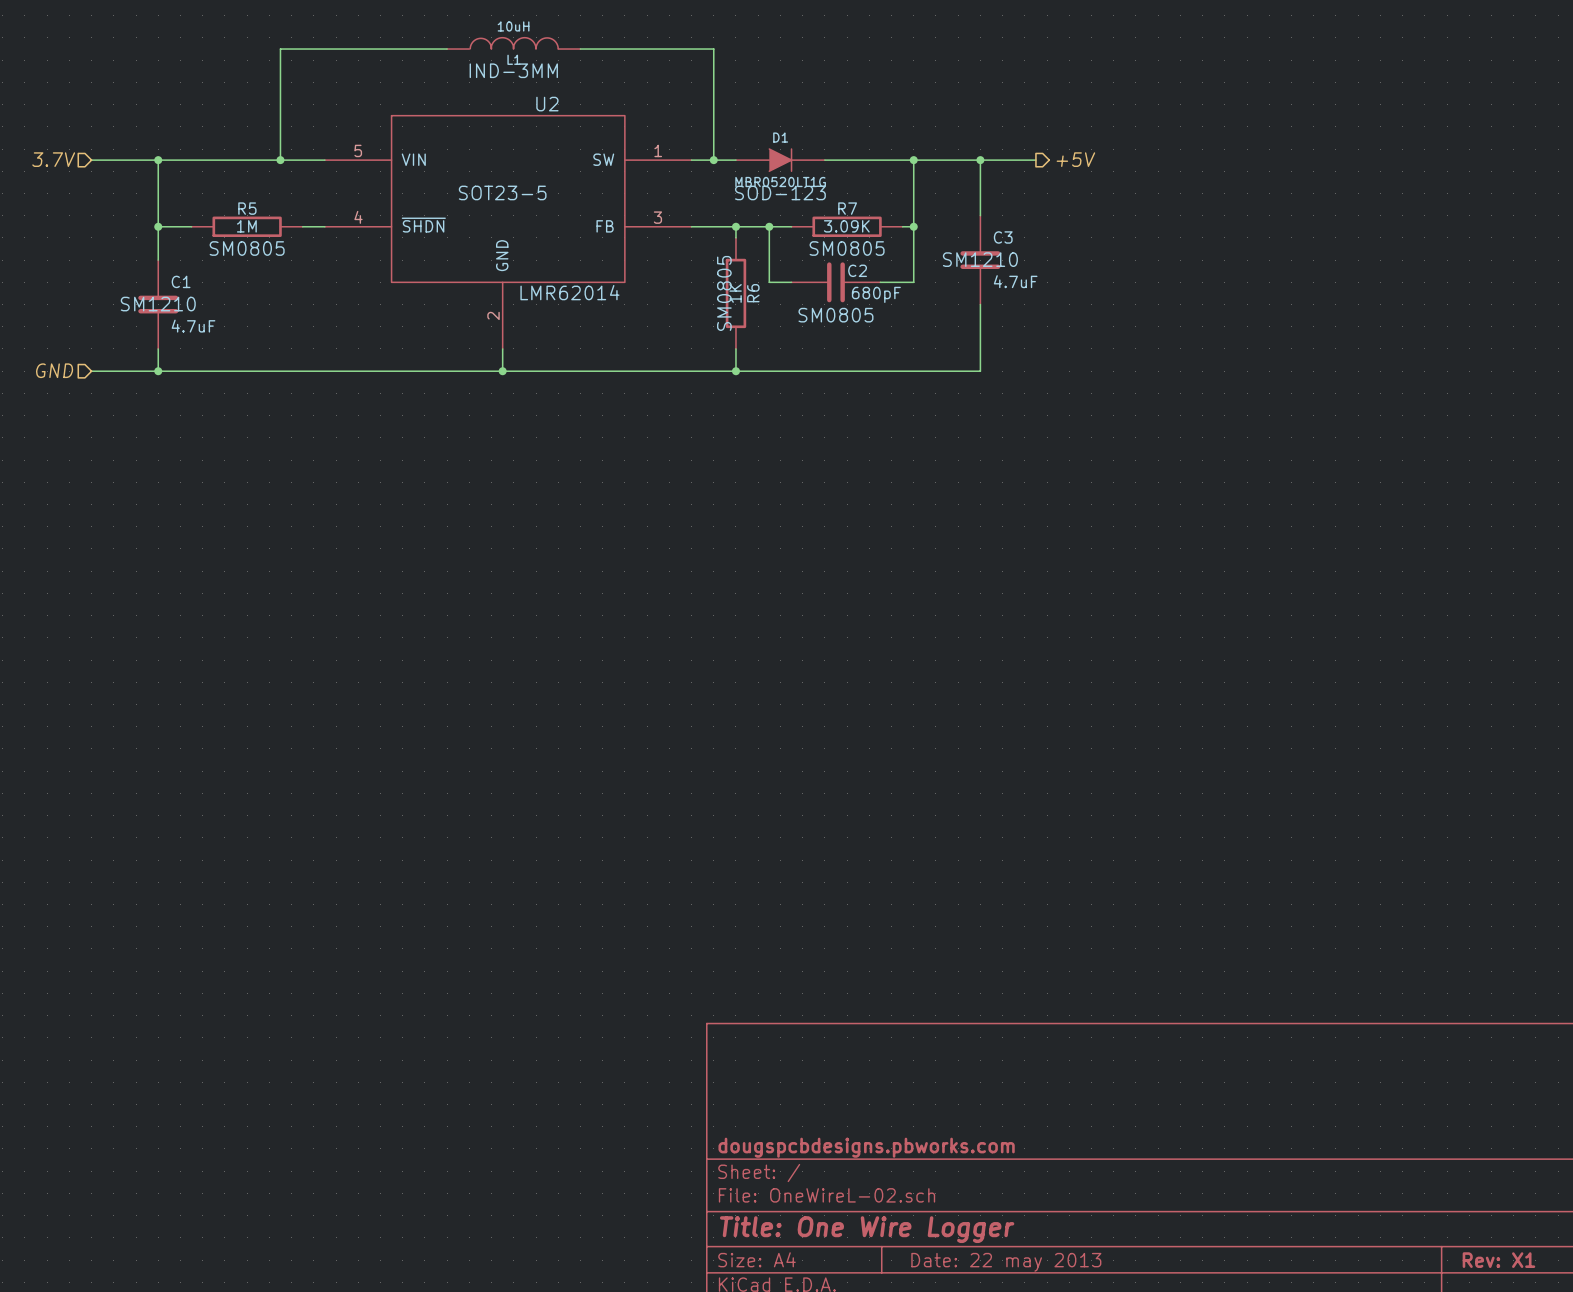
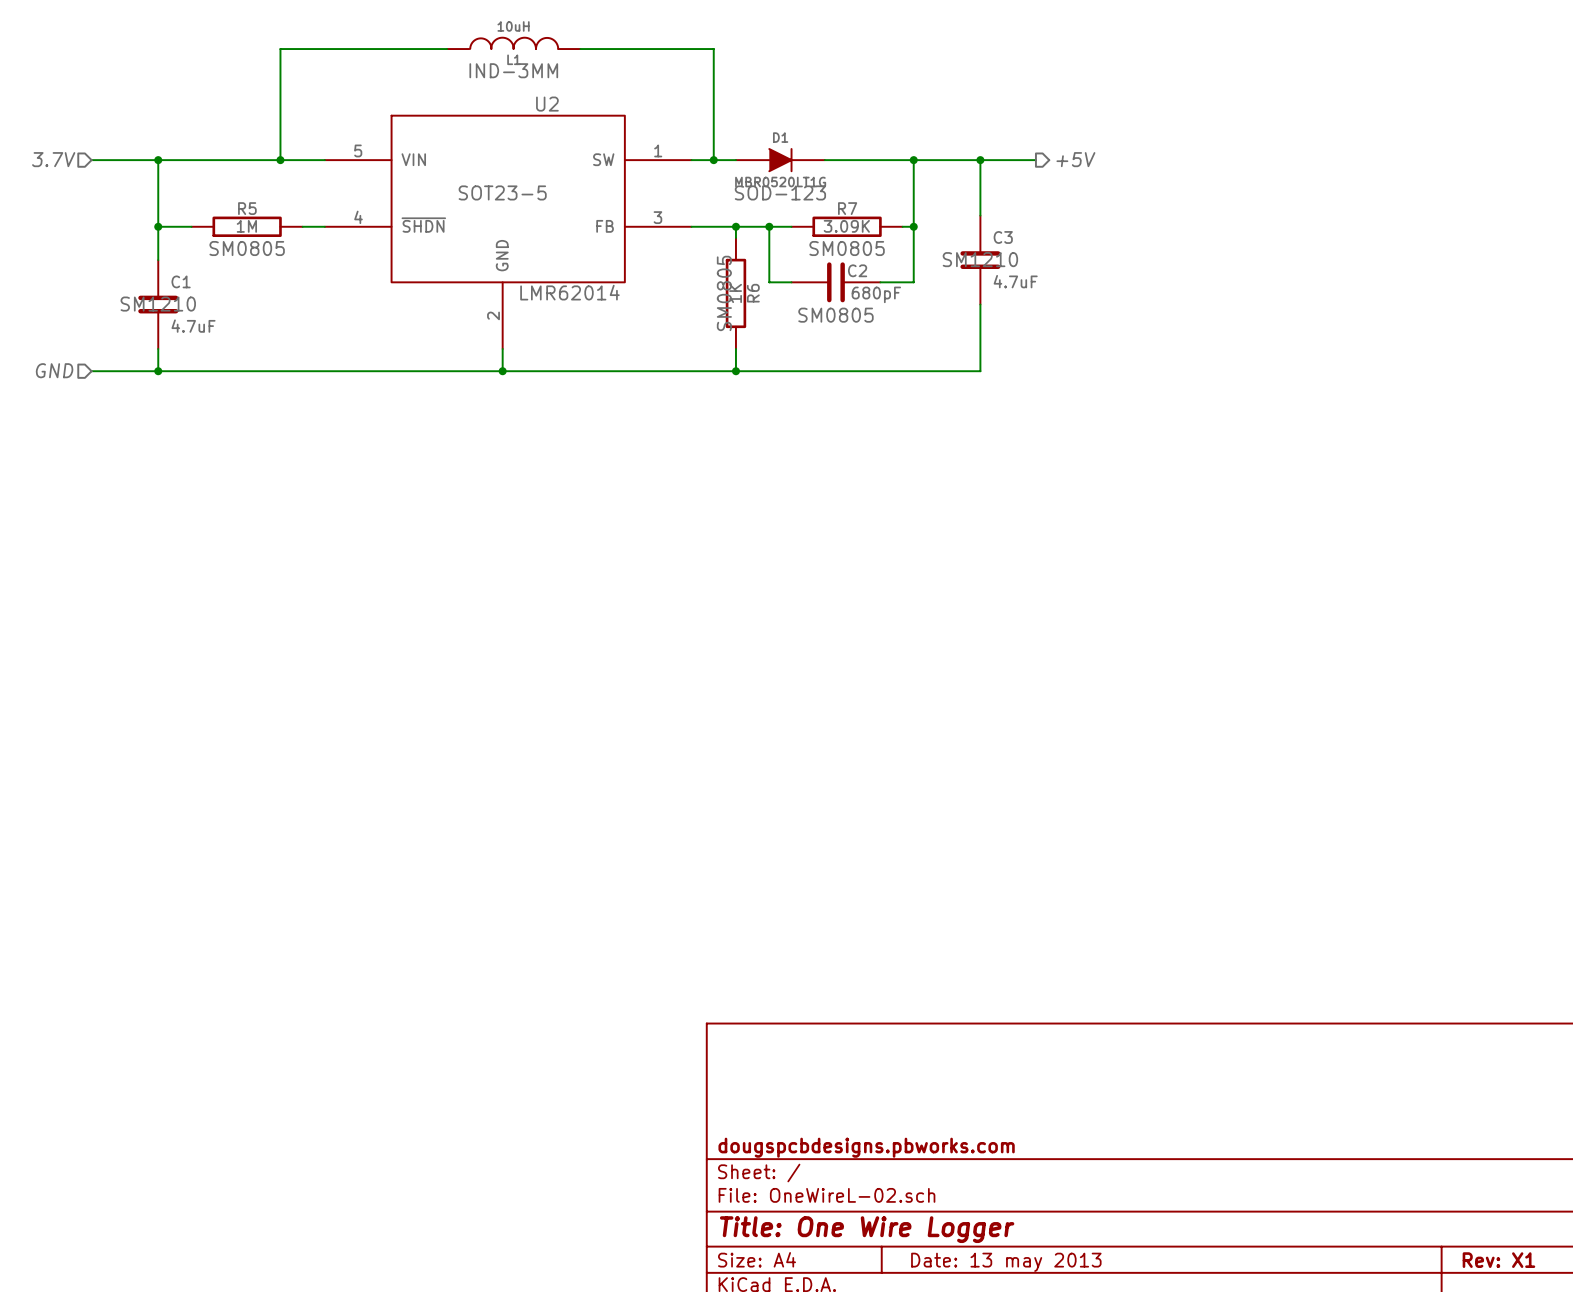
title block: Date: 22 may 2013 (1006, 1262) -> Date: 13 may 2013 (1006, 1262)

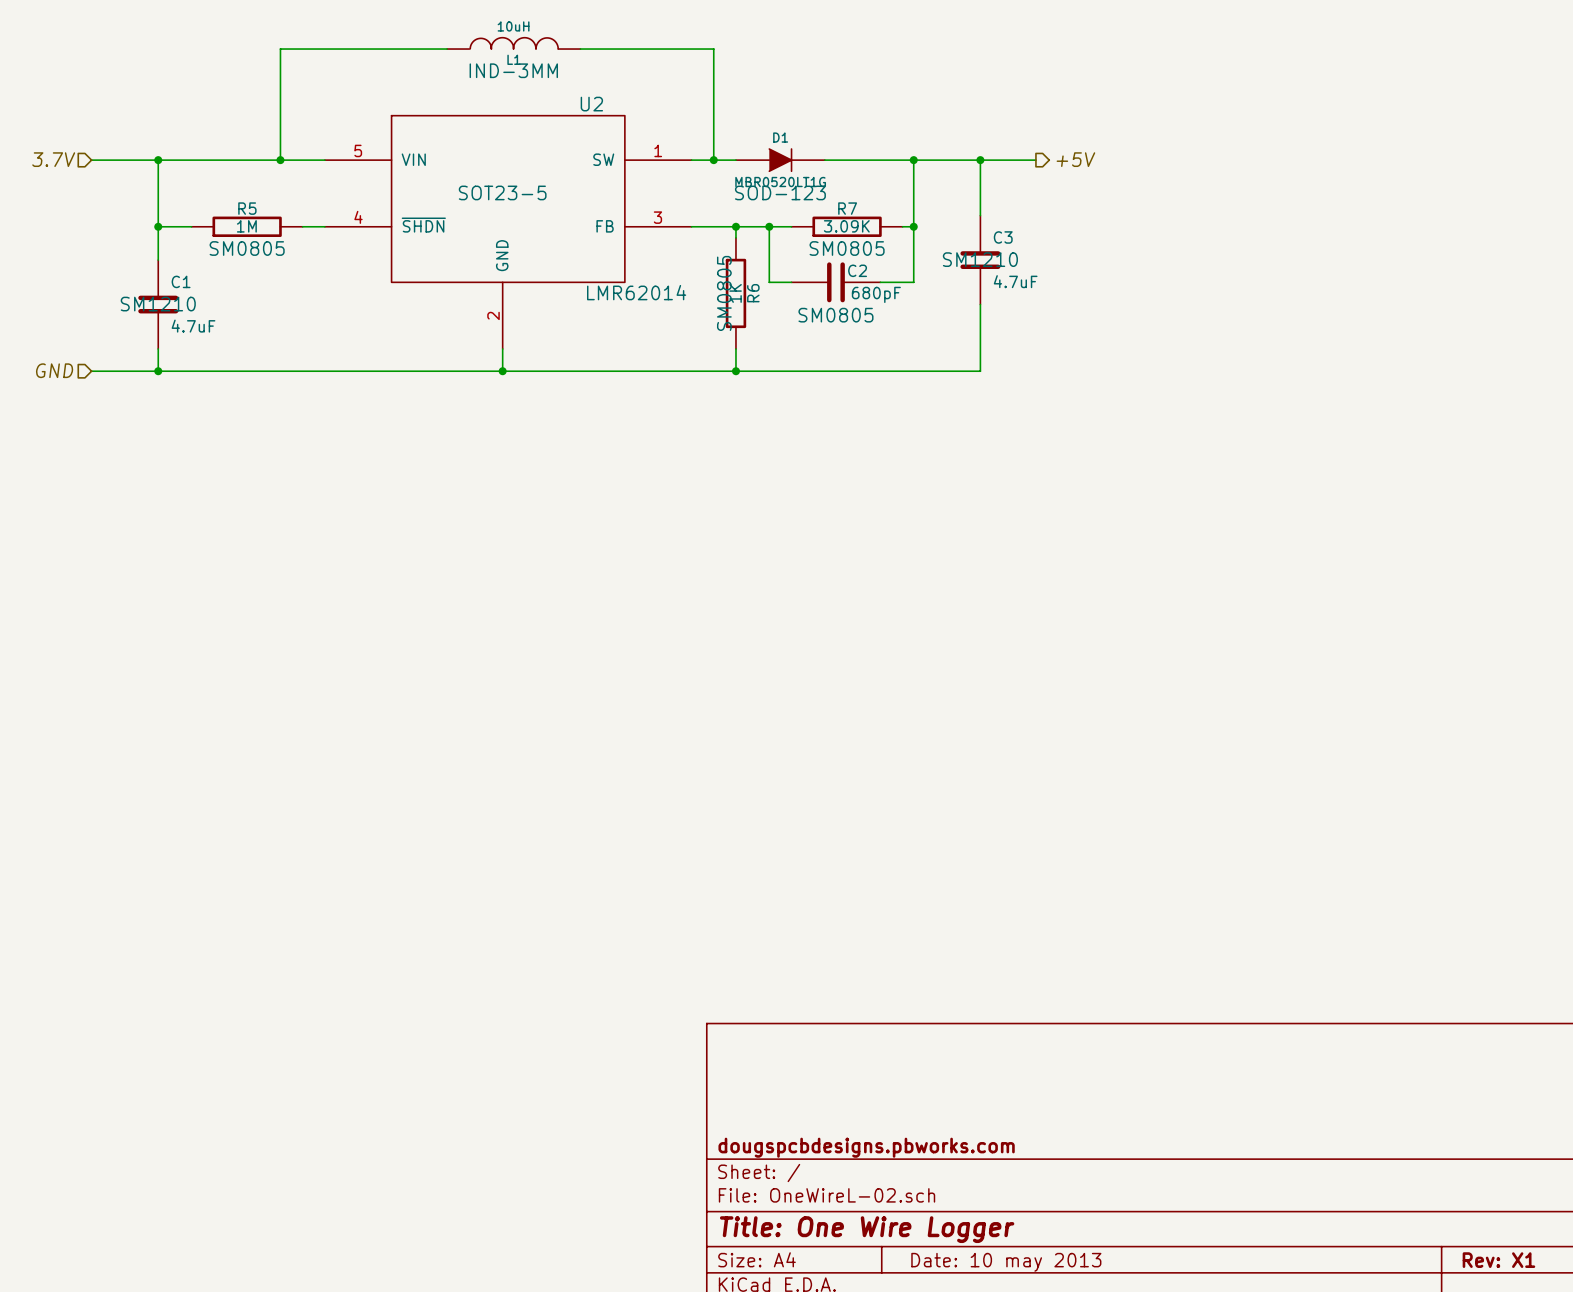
U2 name position: U2 (547, 104) -> U2 (591, 104)
U2 value position: LMR62014 (569, 292) -> LMR62014 (636, 292)
title block: Date: 13 may 2013 (1006, 1262) -> Date: 10 may 2013 (1006, 1262)

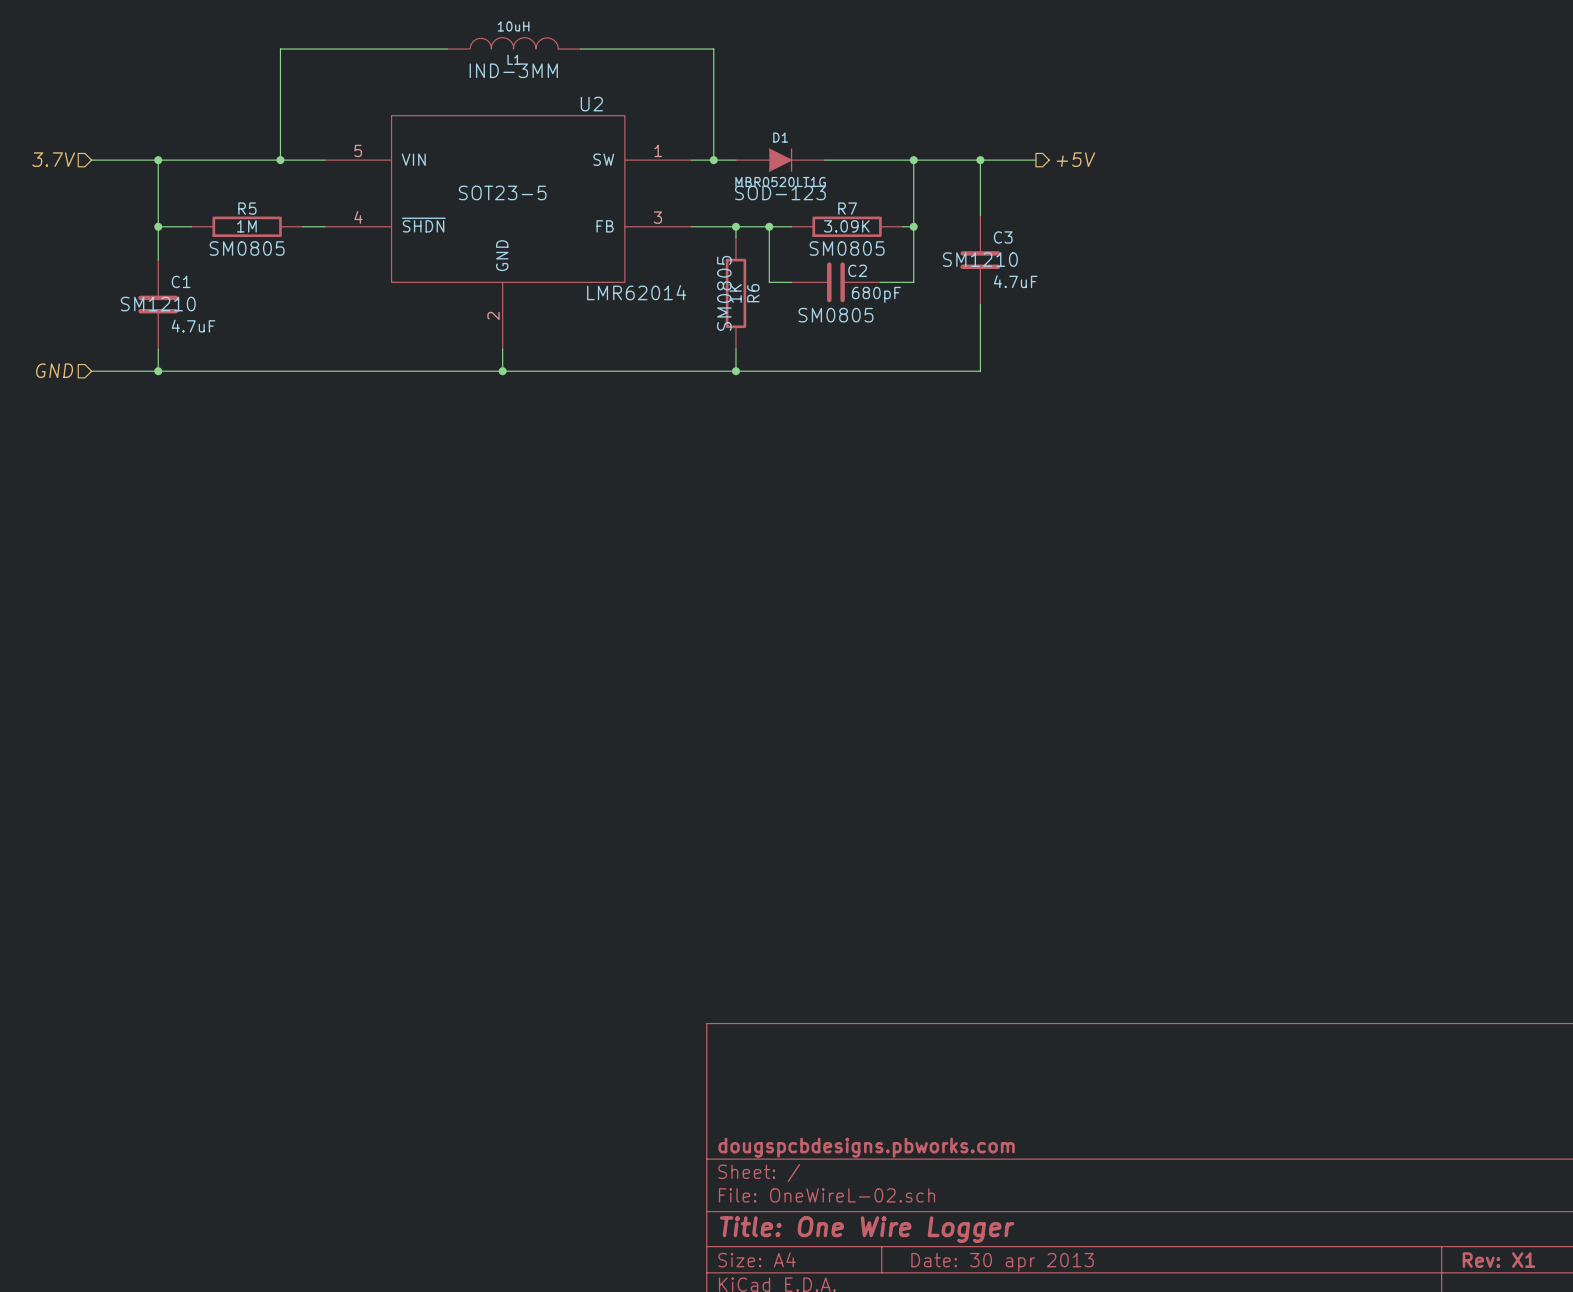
title block: Date: 10 may 2013 (1006, 1262) -> Date: 30 apr 2013 (1002, 1262)

